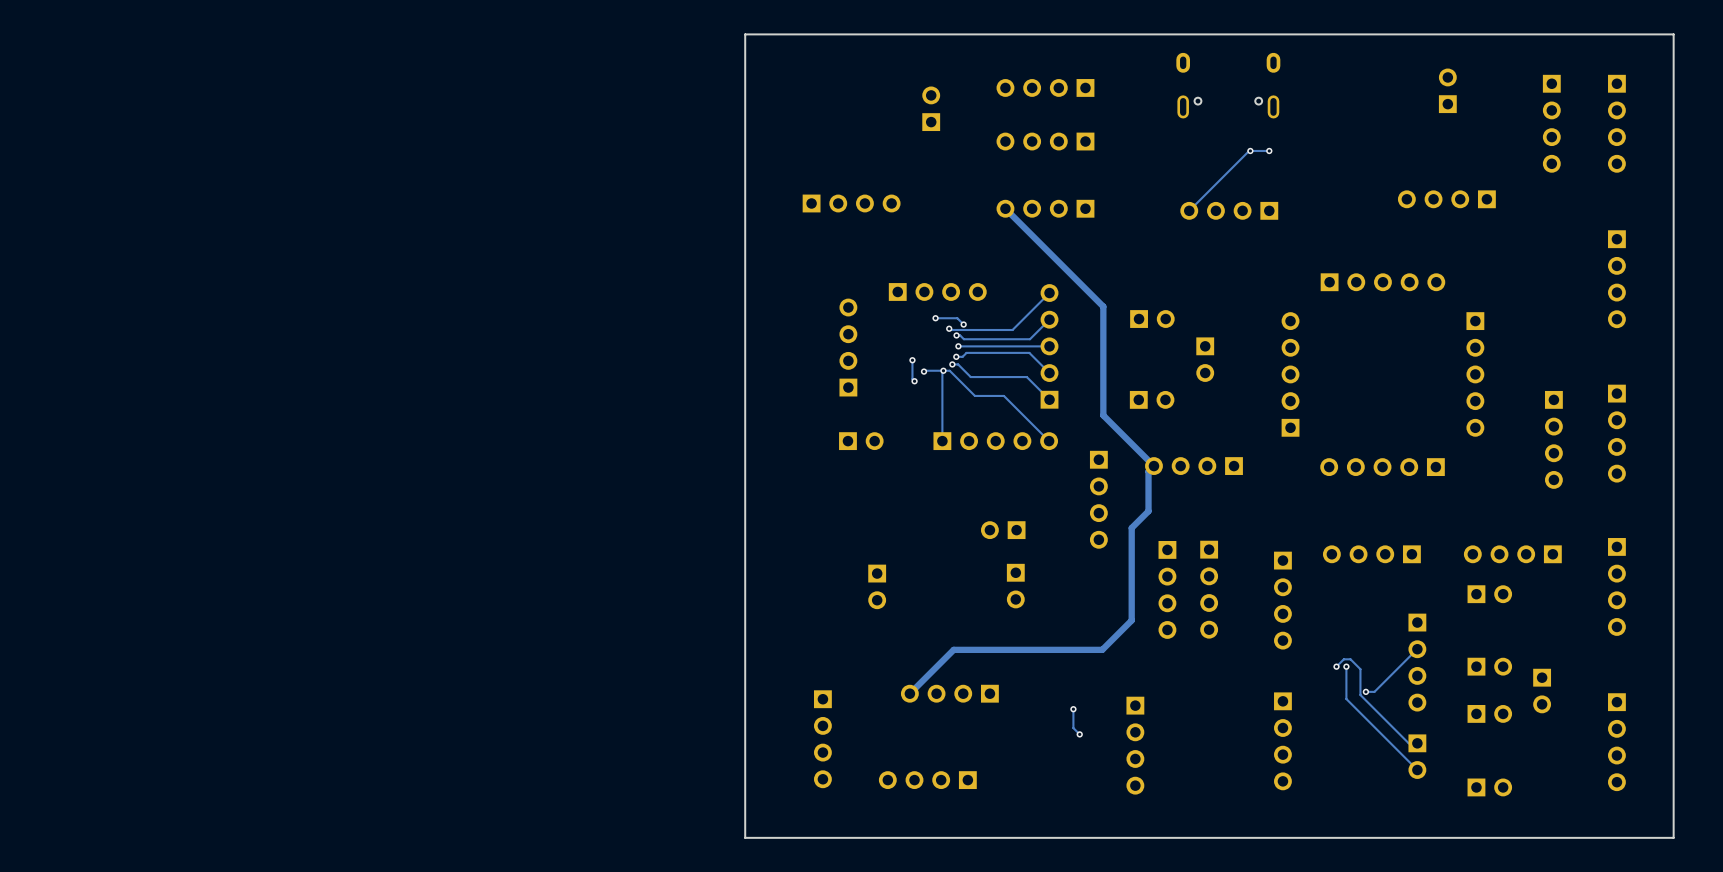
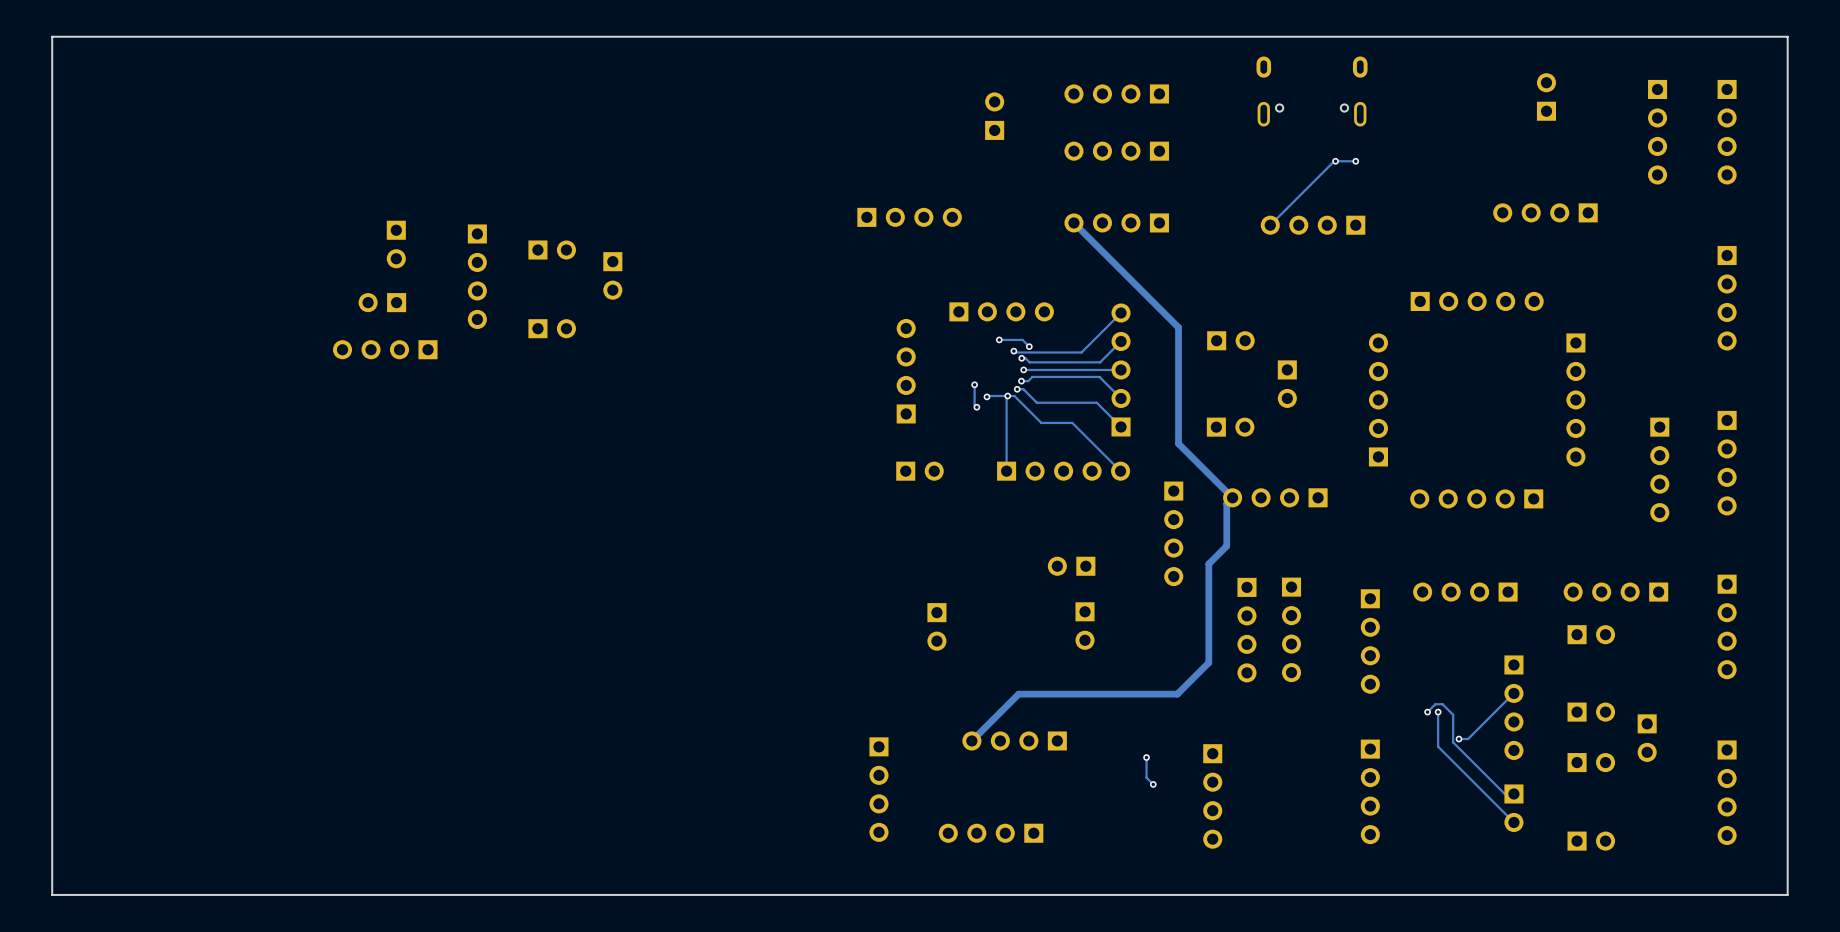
board edge: (745, 34) (745, 837) -> (795, 36) (52, 36) (52, 894) (795, 894)
part: none -> (396, 244)
part: none -> (552, 250)
part: none -> (612, 275)
part: none -> (477, 276)
part: none -> (382, 302)
part: none -> (552, 328)
part: none -> (385, 349)

